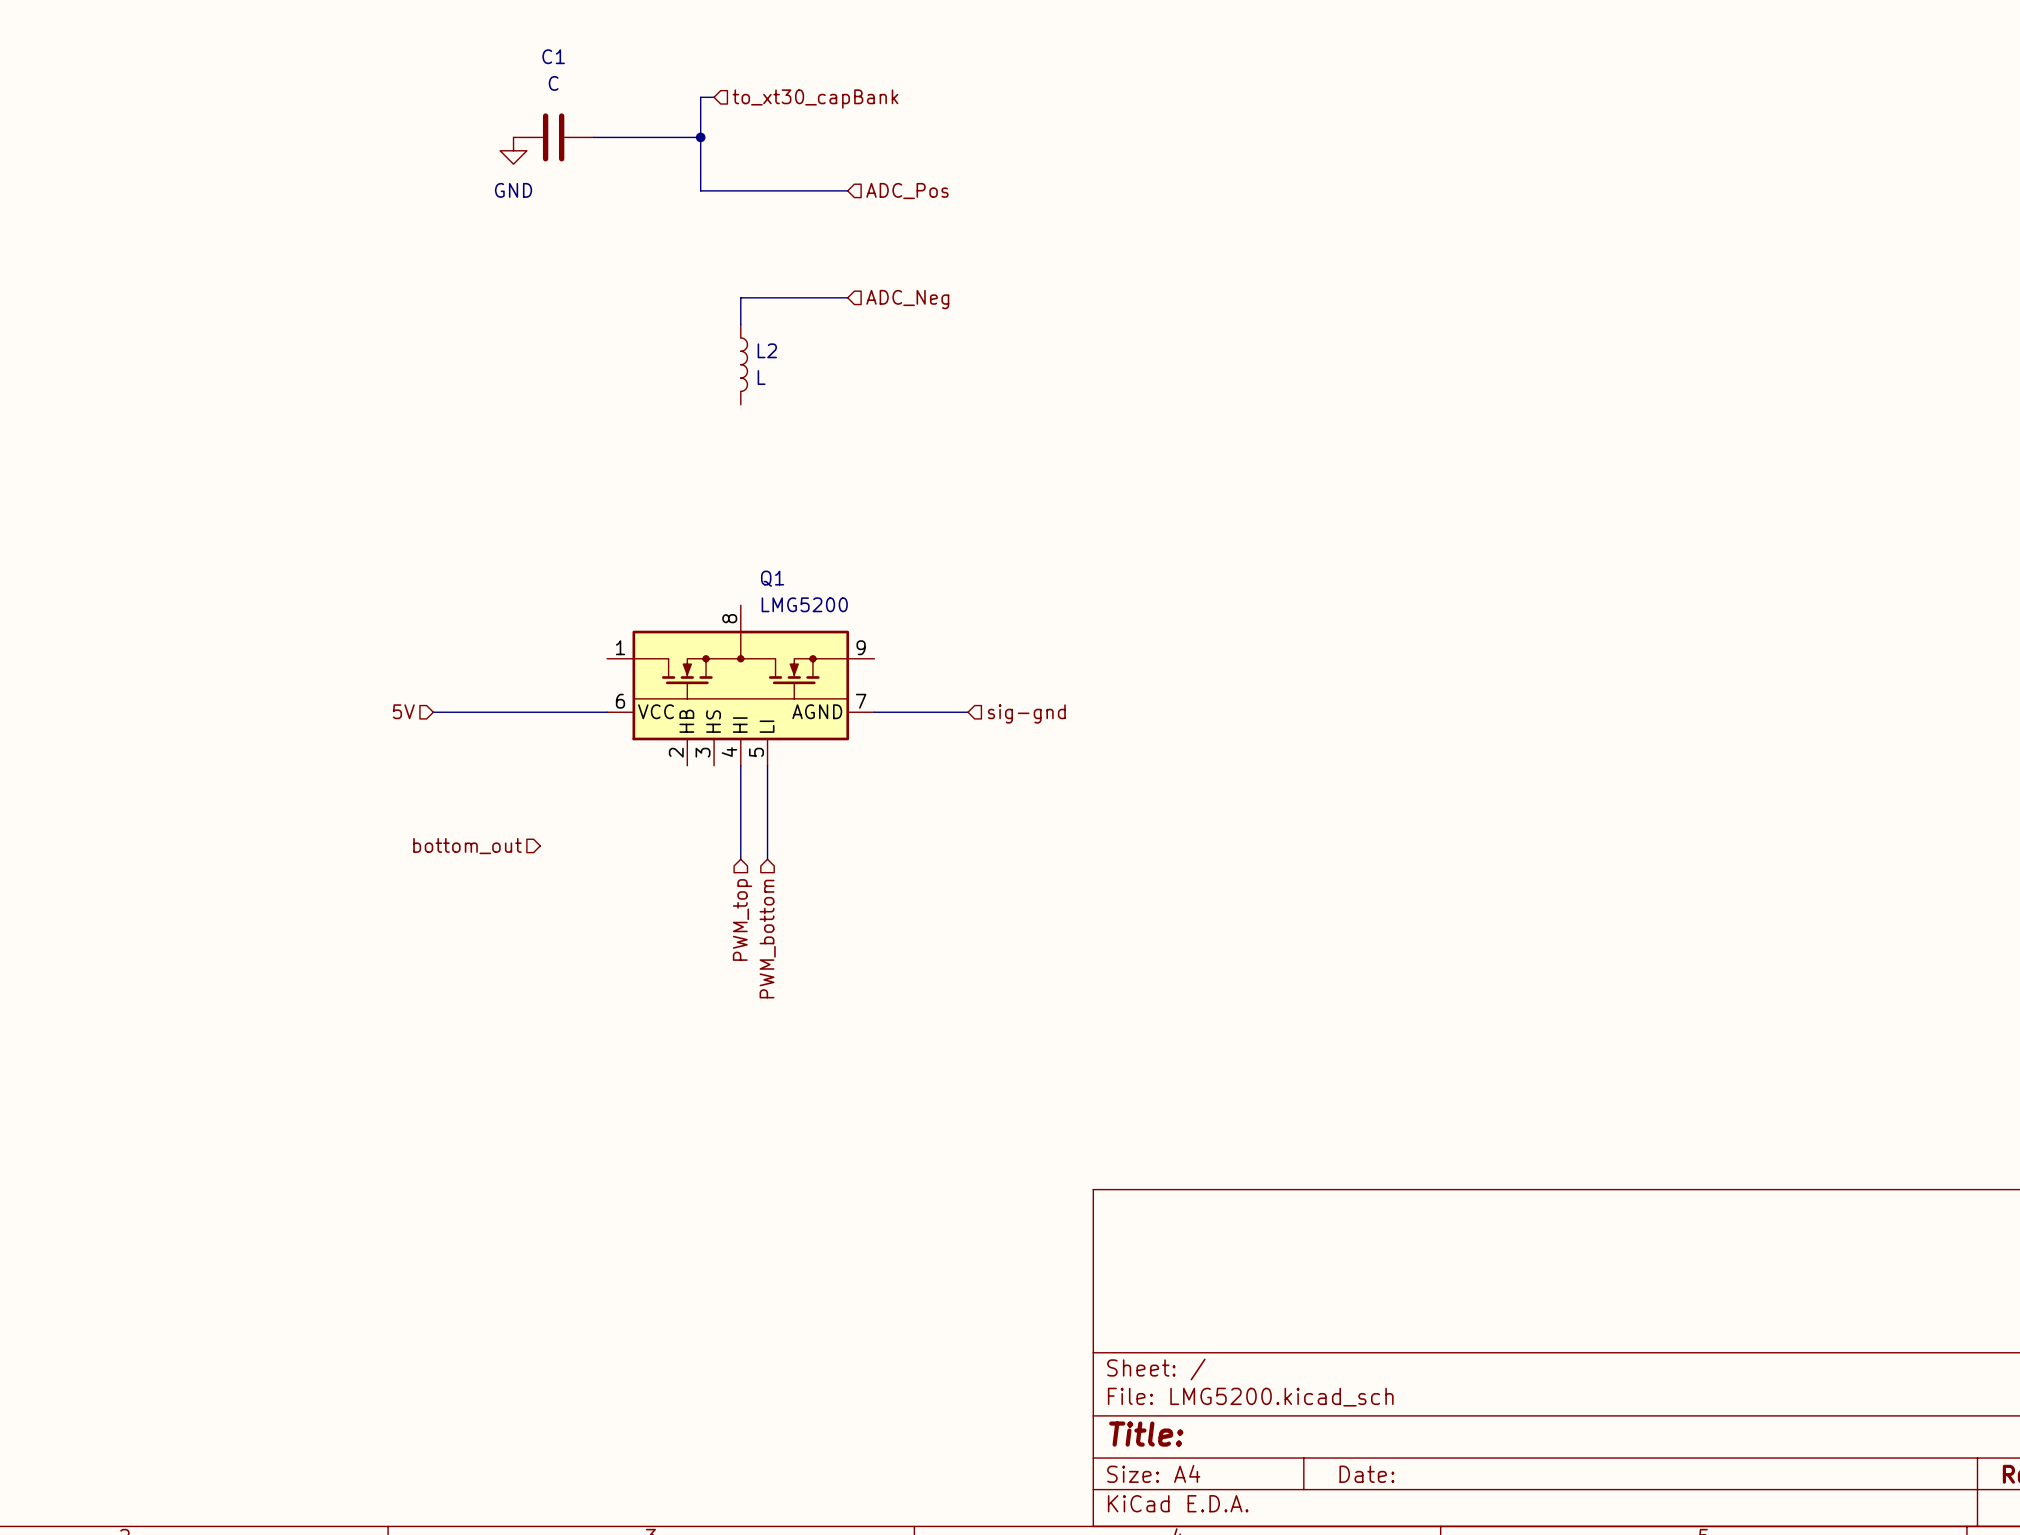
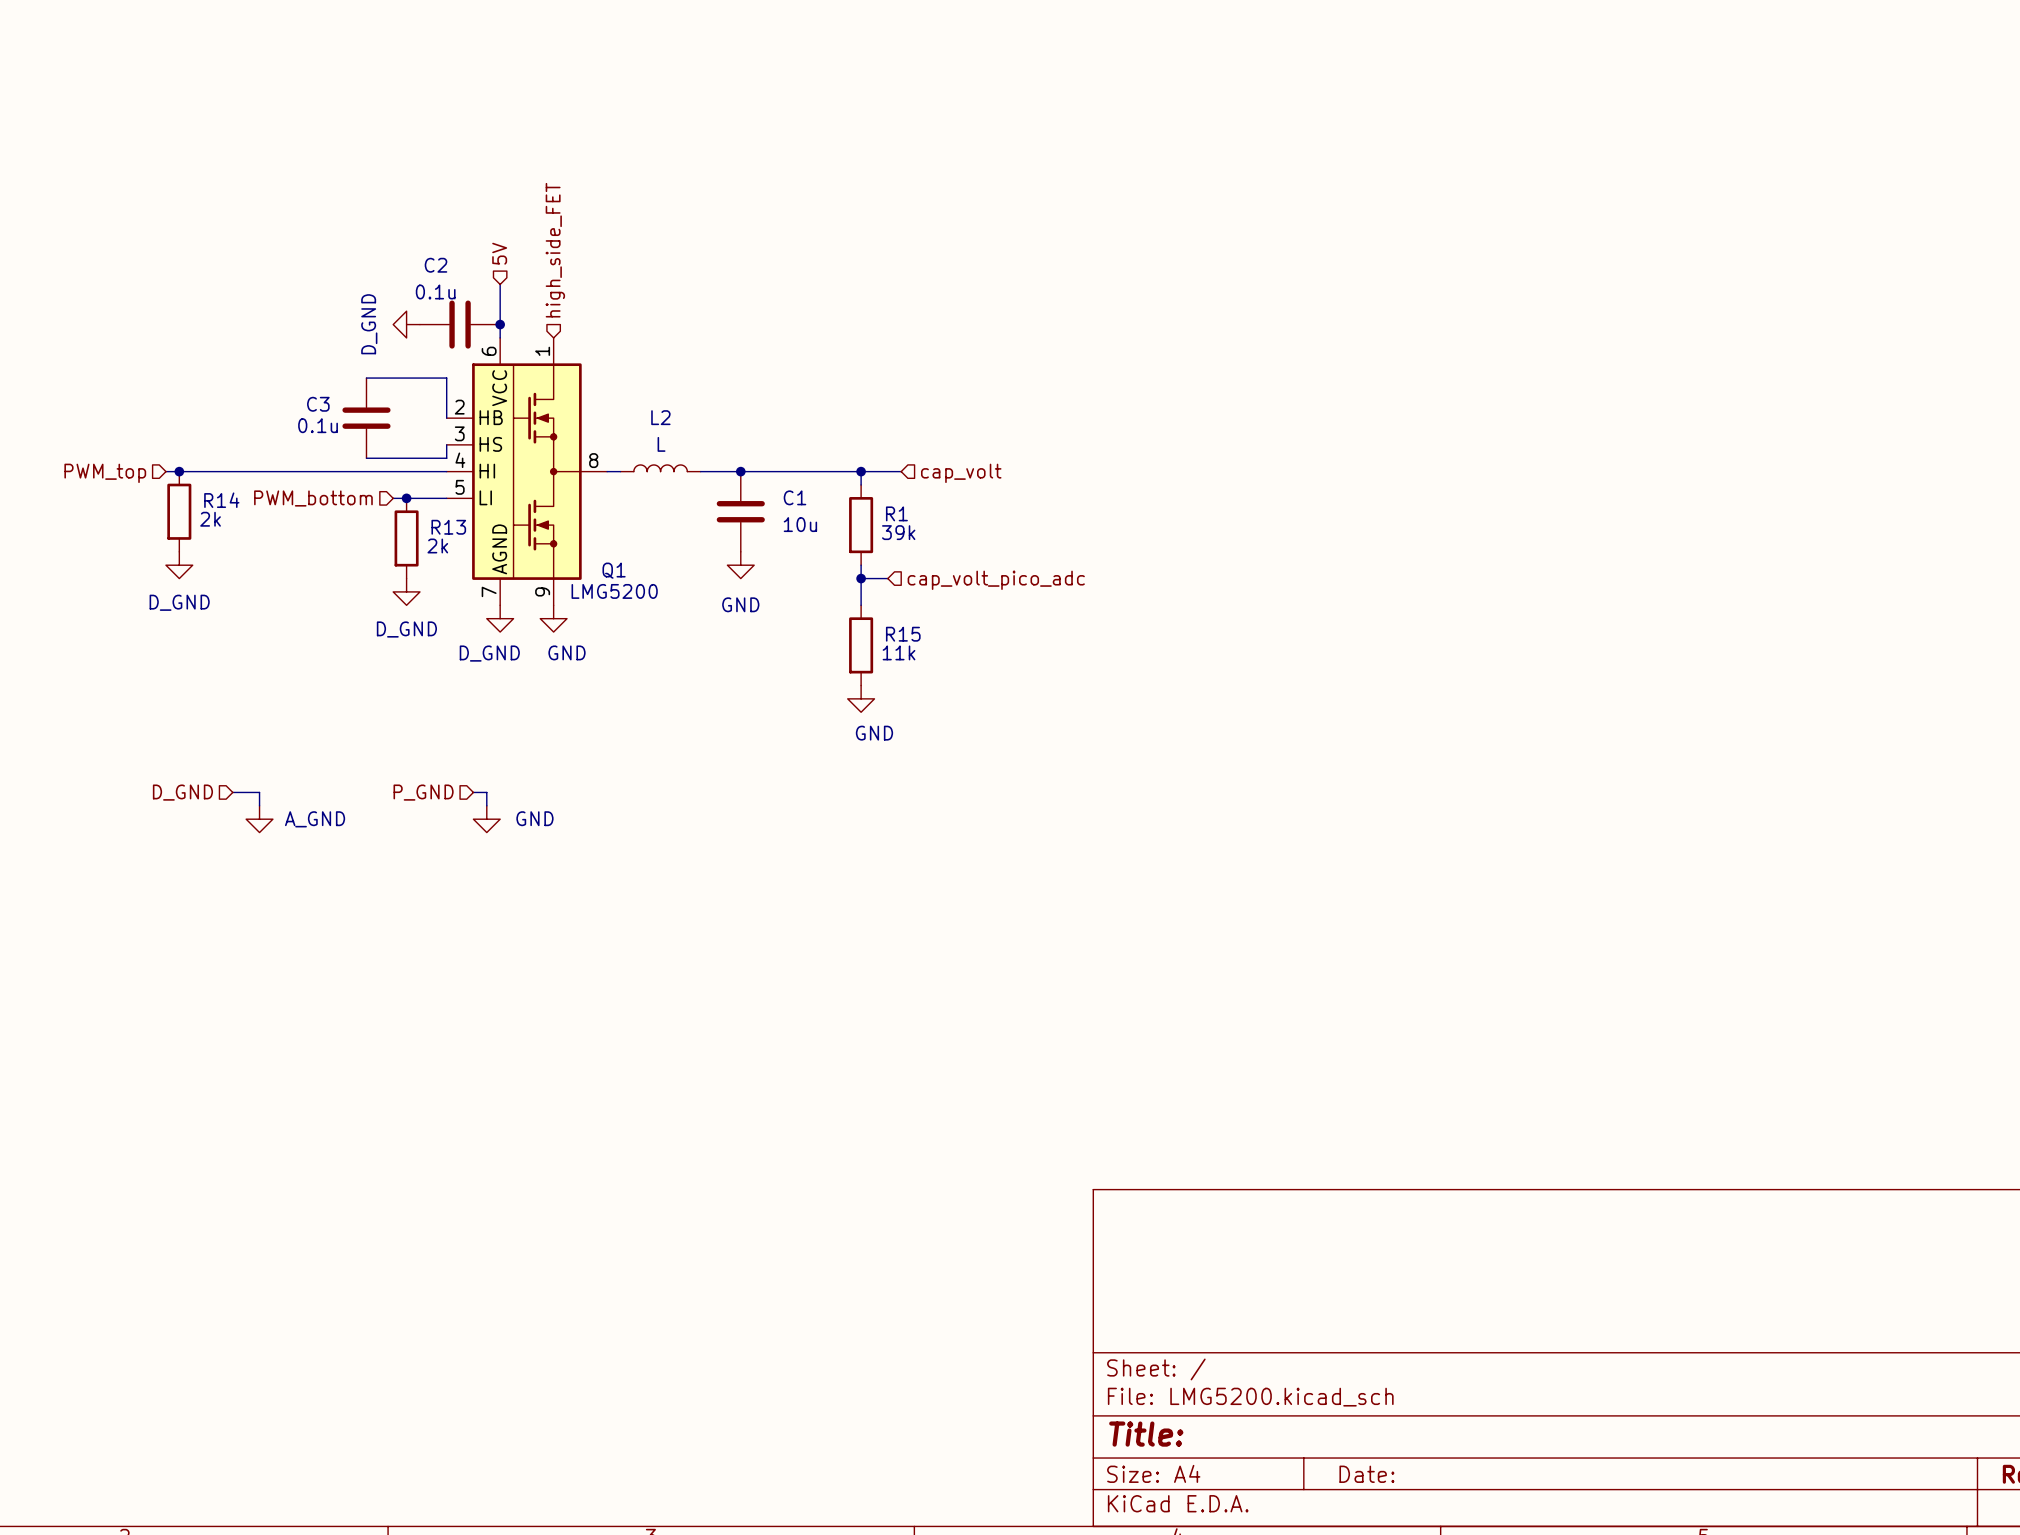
C1 name position: C1 (553, 56) -> C1 (795, 497)
C1 value: C (553, 83) -> 10u (800, 524)
wire: (714, 97) (700, 97) (700, 190) (847, 190) -> none
hierarchical label: to_xt30_capBank (815, 99) -> none
C1 rotation: 0° (553, 137) -> 90° clockwise (740, 511)
C1 position: (553, 137) -> (740, 511)
wire: (593, 137) (700, 137) -> none
junction: (700, 137) -> none
power symbol: GND (513, 150) -> none
hierarchical label: ADC_Pos (907, 191) -> none
hierarchical label: none -> high_side_FET (555, 250)
hierarchical label: none -> 5V (499, 253)
wire: none -> (500, 284) (500, 337)
wire: (847, 297) (740, 297) (740, 324) -> none
hierarchical label: ADC_Neg (907, 299) -> none
power symbol: none -> D_GND (406, 324)
C2: none -> 0.1u (460, 324)
junction: none -> (500, 324)
L2 name position: L2 (767, 350) -> L2 (660, 417)
L2 rotation: 0° (744, 364) -> 90° counterclockwise (660, 468)
L2 position: (744, 364) -> (660, 468)
wire: none -> (366, 378) (446, 378) (446, 418)
C3: none -> 0.1u (366, 418)
wire: none -> (446, 444) (446, 458) (366, 458)
wire: none -> (165, 471) (446, 471)
junction: none -> (179, 471)
wire: none -> (607, 471) (620, 471)
wire: none -> (700, 471) (901, 471)
junction: none -> (740, 471)
wire: none -> (861, 471) (861, 484)
junction: none -> (861, 471)
hierarchical label: none -> PWM_top (105, 473)
hierarchical label: none -> cap_volt (961, 473)
hierarchical label: none -> PWM_bottom (313, 498)
wire: none -> (393, 498) (446, 498)
junction: none -> (406, 498)
R14: none -> 2k (179, 511)
R1: none -> 39k (861, 525)
R13: none -> 2k (406, 538)
power symbol: none -> D_GND (179, 565)
power symbol: none -> GND (740, 565)
wire: none -> (861, 565) (861, 605)
Q1 name position: Q1 (772, 578) -> Q1 (614, 570)
wire: none -> (861, 578) (887, 578)
junction: none -> (861, 578)
hierarchical label: none -> cap_volt_pico_adc (996, 580)
power symbol: none -> D_GND (406, 591)
Q1 value position: LMG5200 (804, 604) -> LMG5200 (614, 591)
power symbol: none -> D_GND (500, 618)
power symbol: none -> GND (553, 618)
R15: none -> 11k (861, 645)
Q1 rotation: 0° (740, 685) -> 90° clockwise (526, 471)
Q1 position: (740, 685) -> (526, 471)
power symbol: none -> GND (861, 698)
hierarchical label: 5V (403, 711) -> none
wire: (433, 712) (607, 712) -> none
wire: (874, 712) (968, 712) -> none
hierarchical label: sig-gnd (1026, 713) -> none
wire: (740, 765) (740, 859) -> none
wire: (767, 765) (767, 859) -> none
hierarchical label: none -> D_GND (182, 792)
wire: none -> (232, 792) (259, 792) (259, 805)
hierarchical label: none -> P_GND (423, 792)
wire: none -> (473, 792) (486, 792) (486, 805)
power symbol: none -> A_GND (259, 819)
power symbol: none -> GND (486, 819)
hierarchical label: bottom_out (467, 846) -> none
hierarchical label: PWM_top (742, 919) -> none
hierarchical label: PWM_bottom (767, 939) -> none

